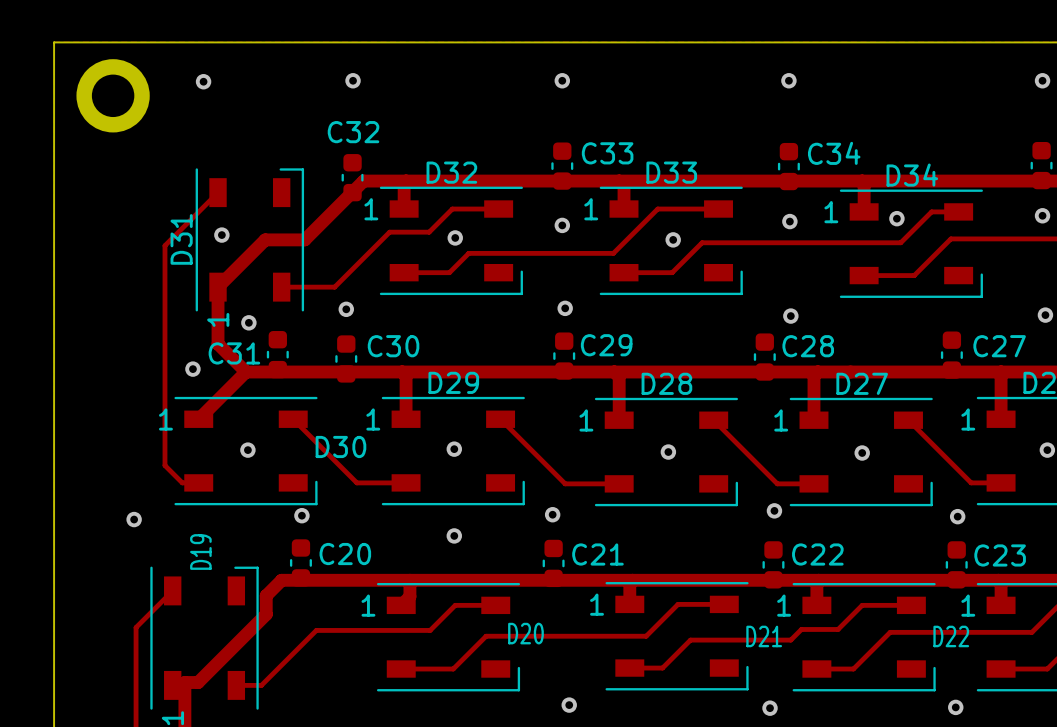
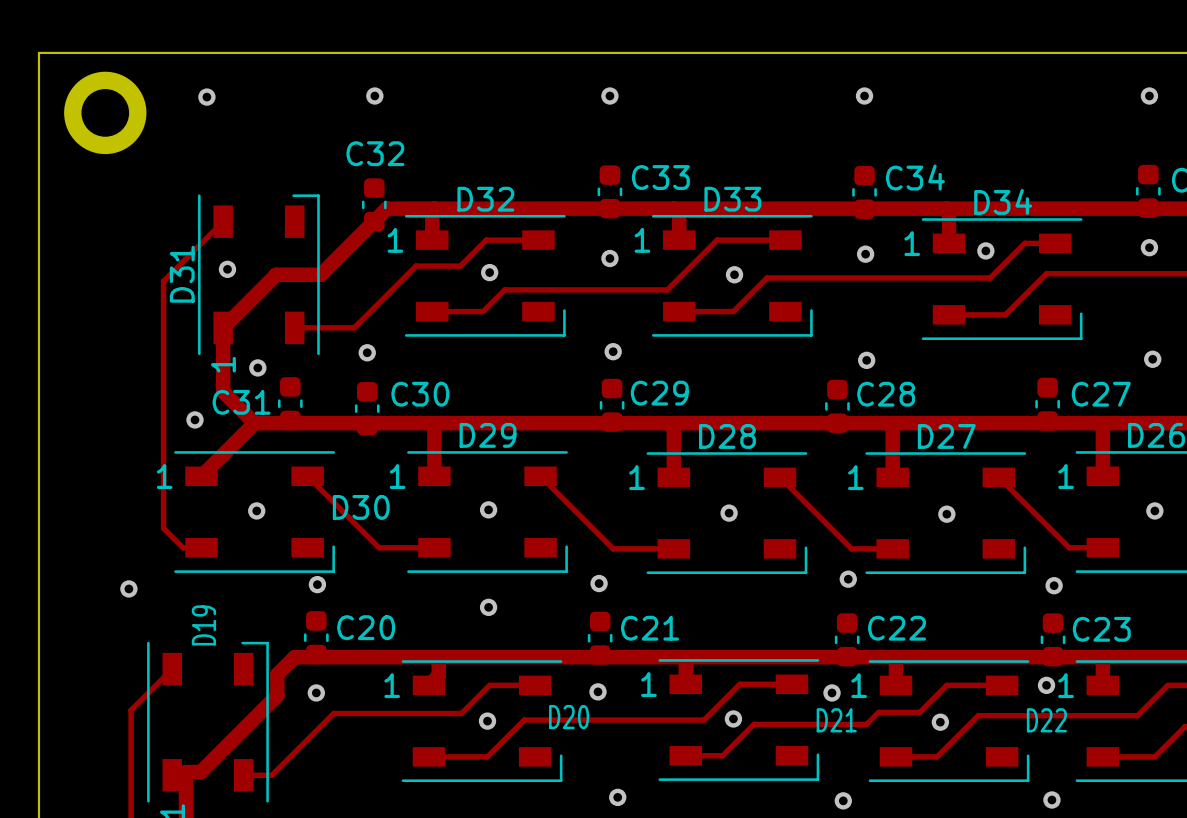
via: none -> (1046, 685)
via: none -> (598, 691)
via: none -> (316, 692)
via: none -> (832, 692)
via: none -> (733, 718)
via: none -> (487, 721)
via: none -> (940, 722)

